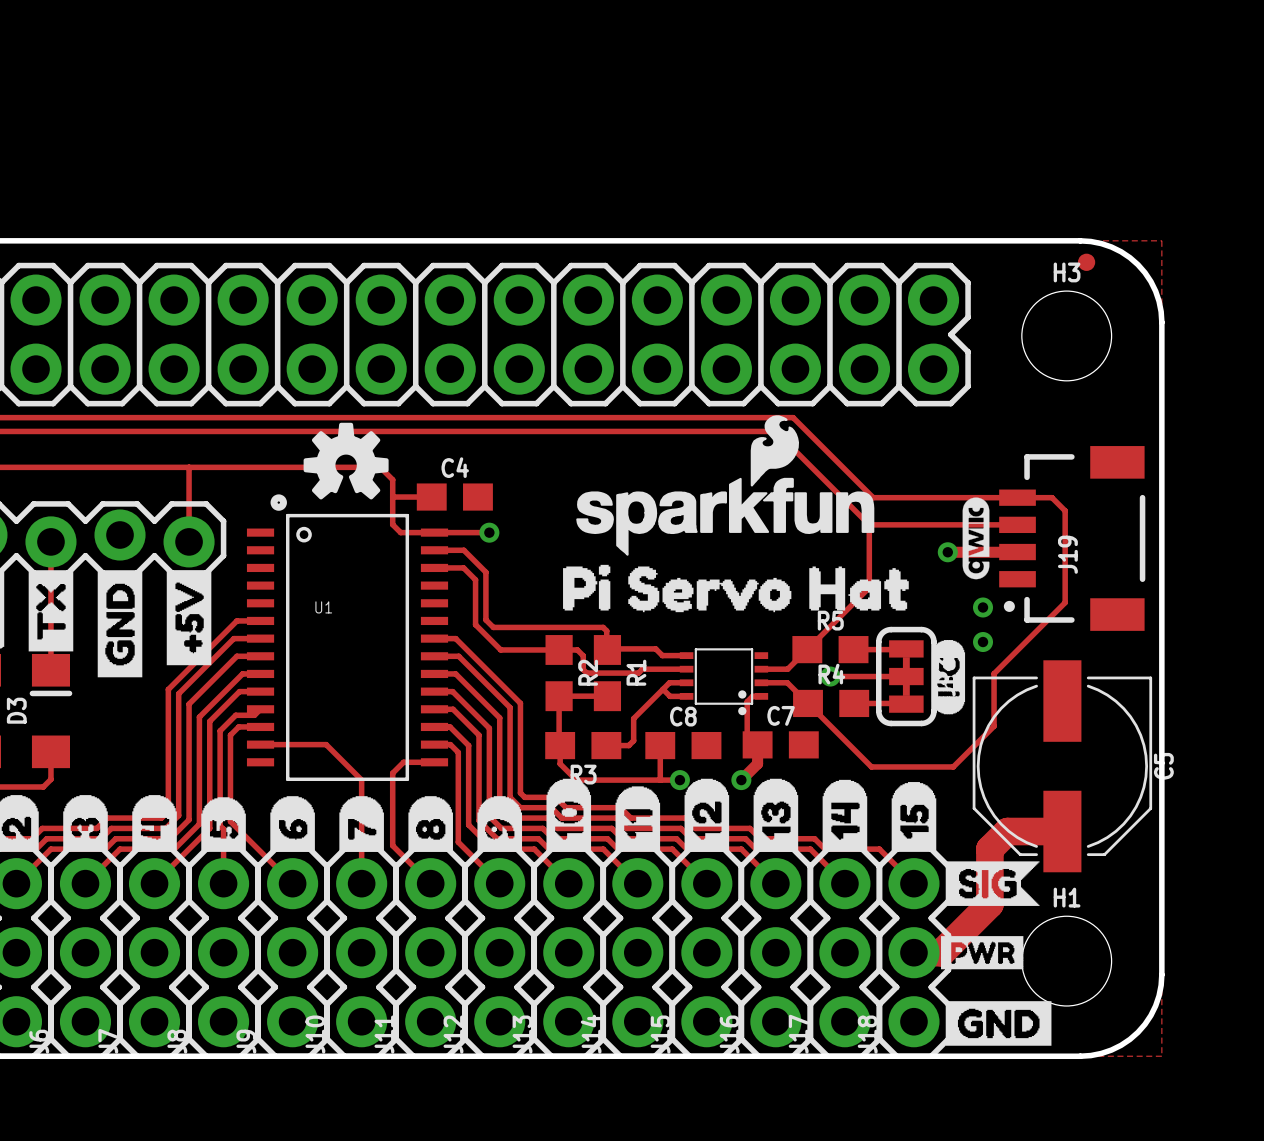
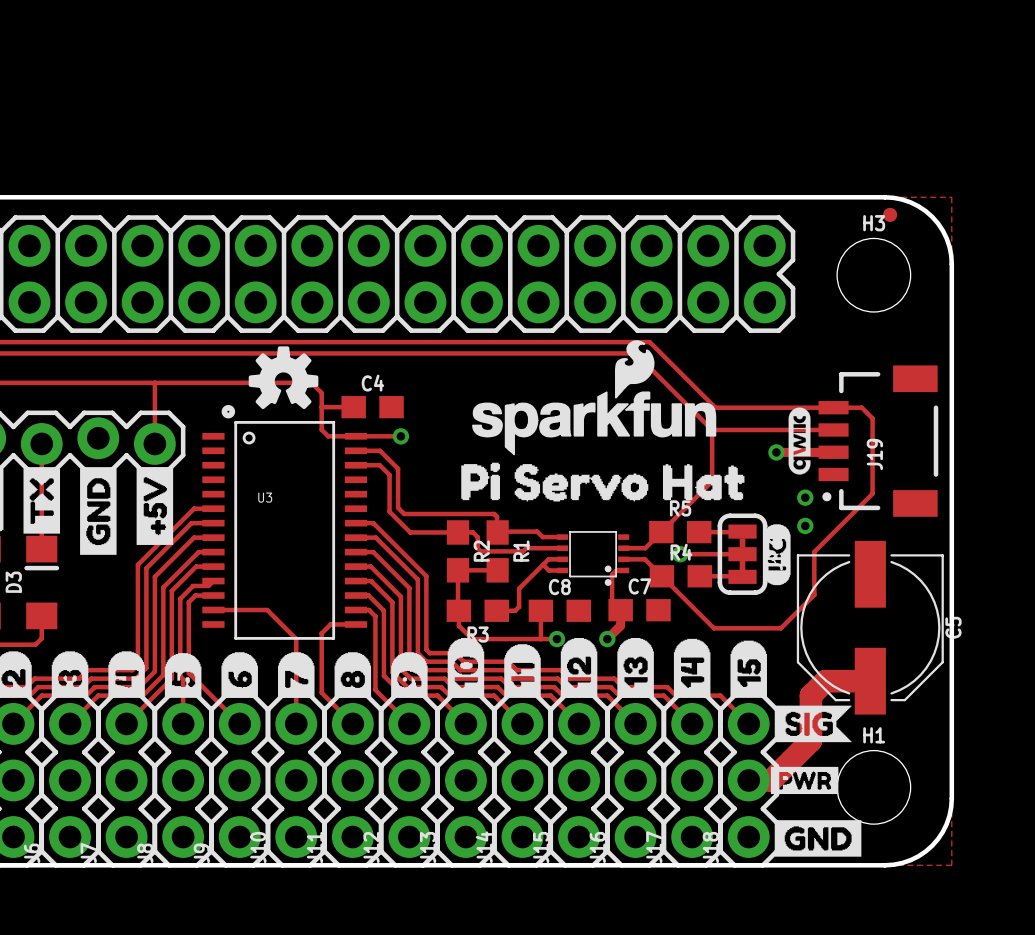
U1 name: U1 (323, 607) -> U3 (265, 497)

